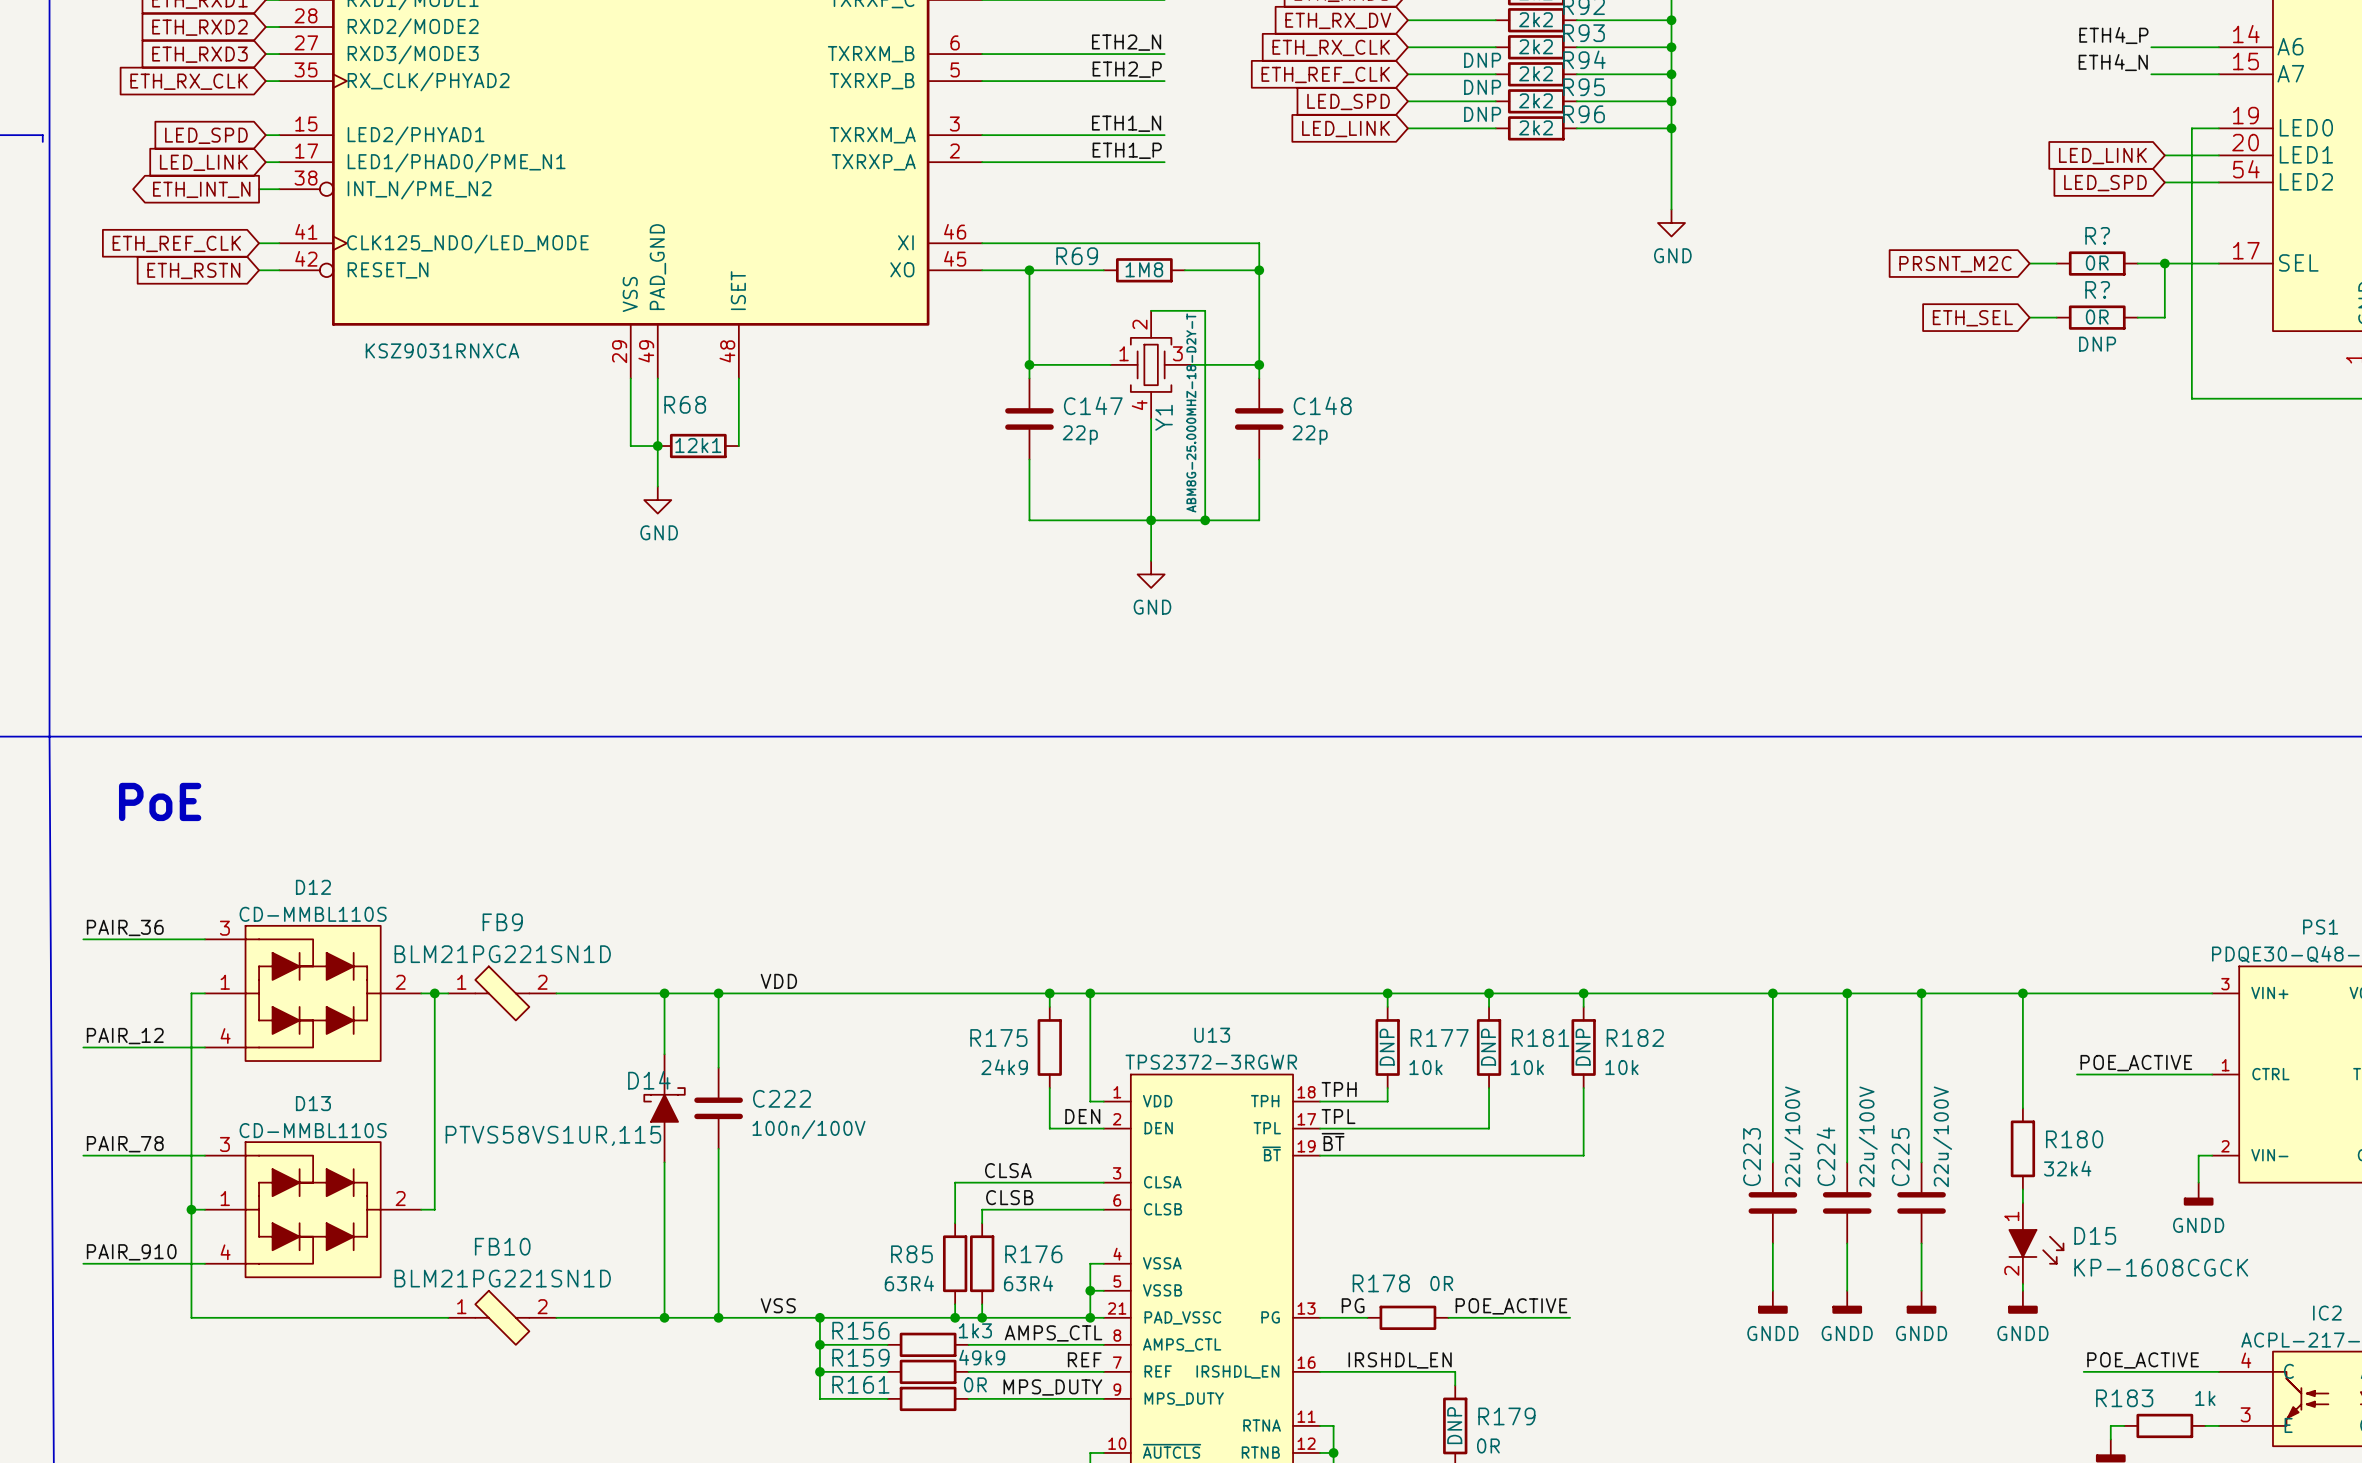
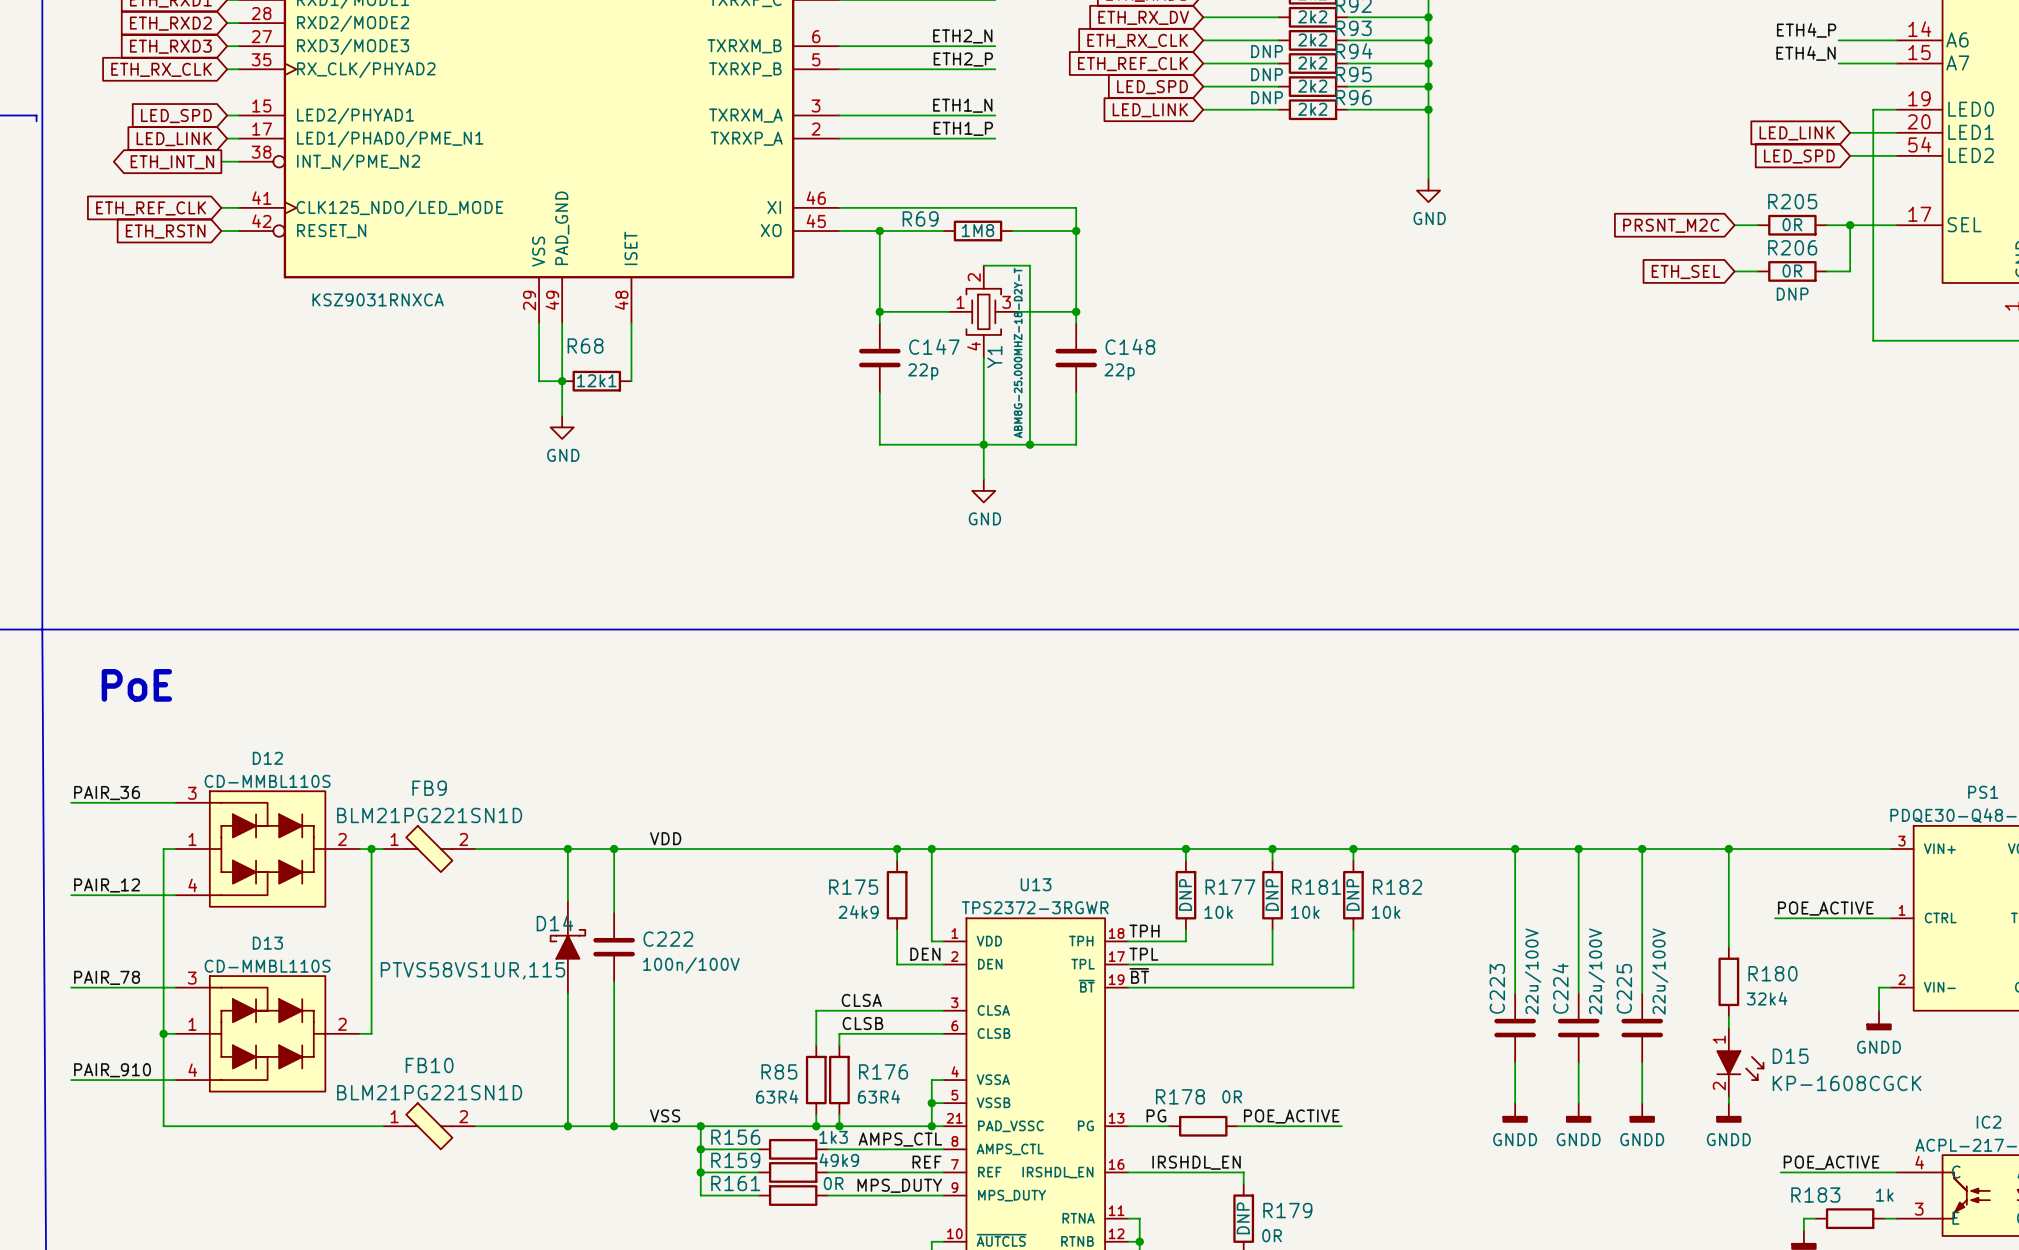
R? name: R? (2097, 235) -> R205 (1792, 201)
R? name: R? (2097, 289) -> R206 (1792, 247)

